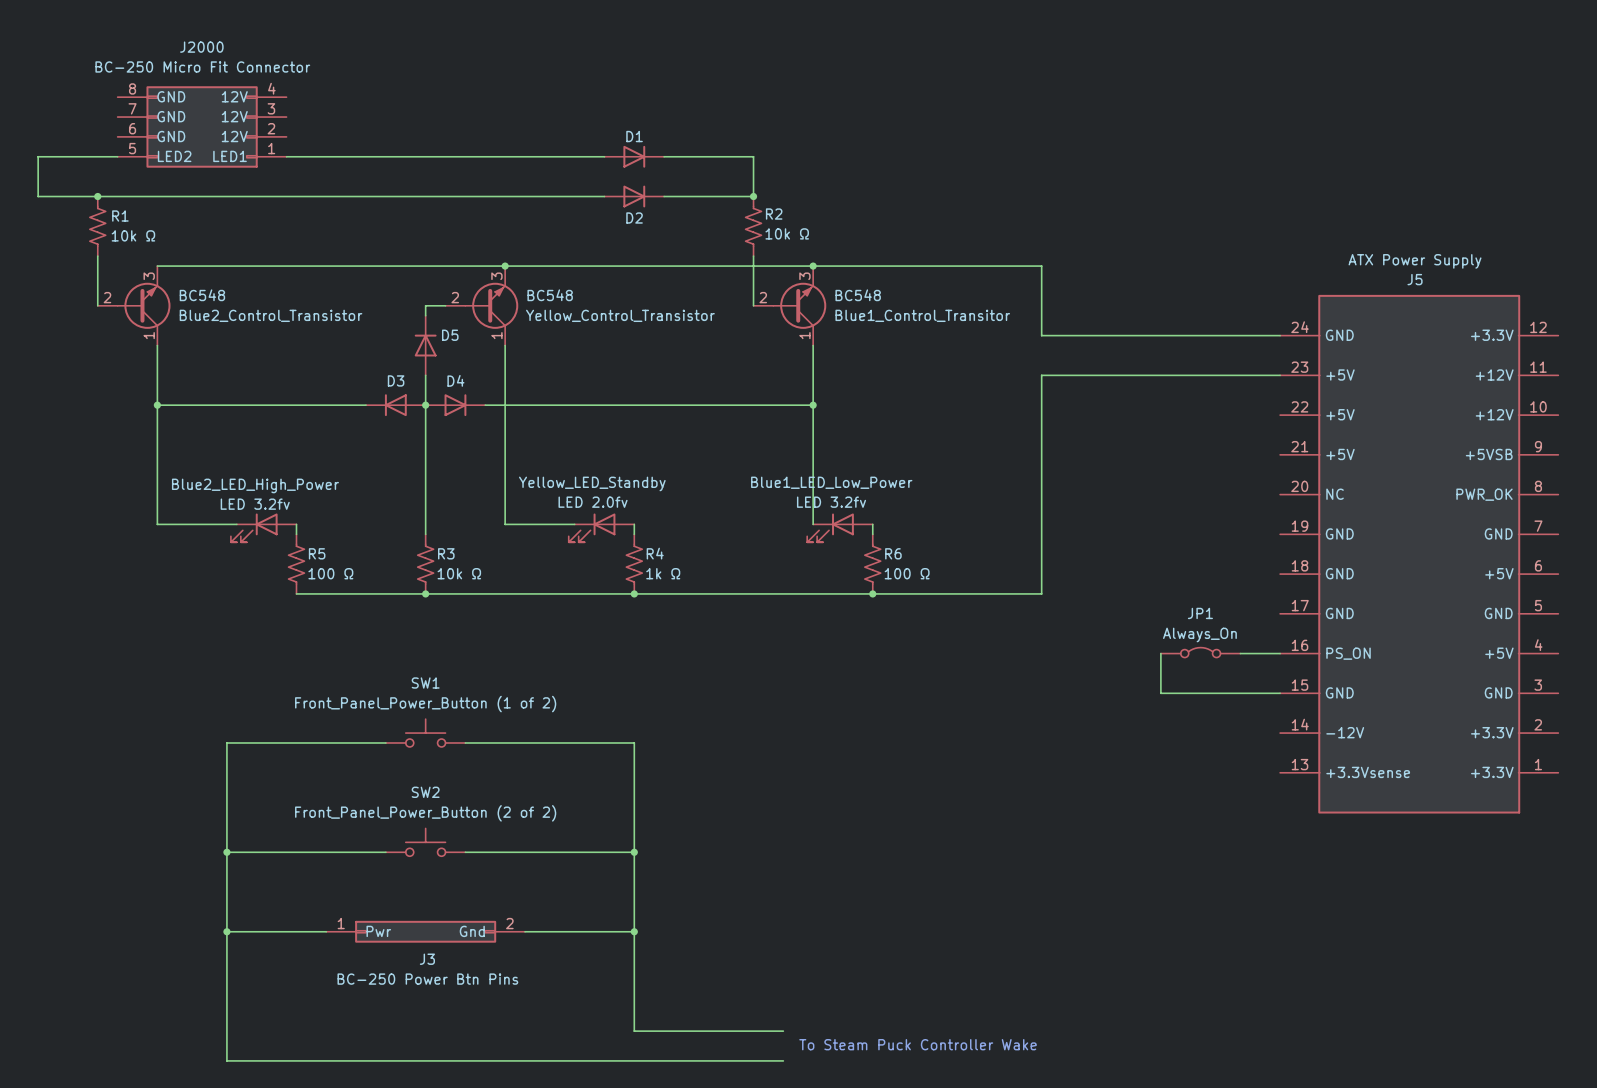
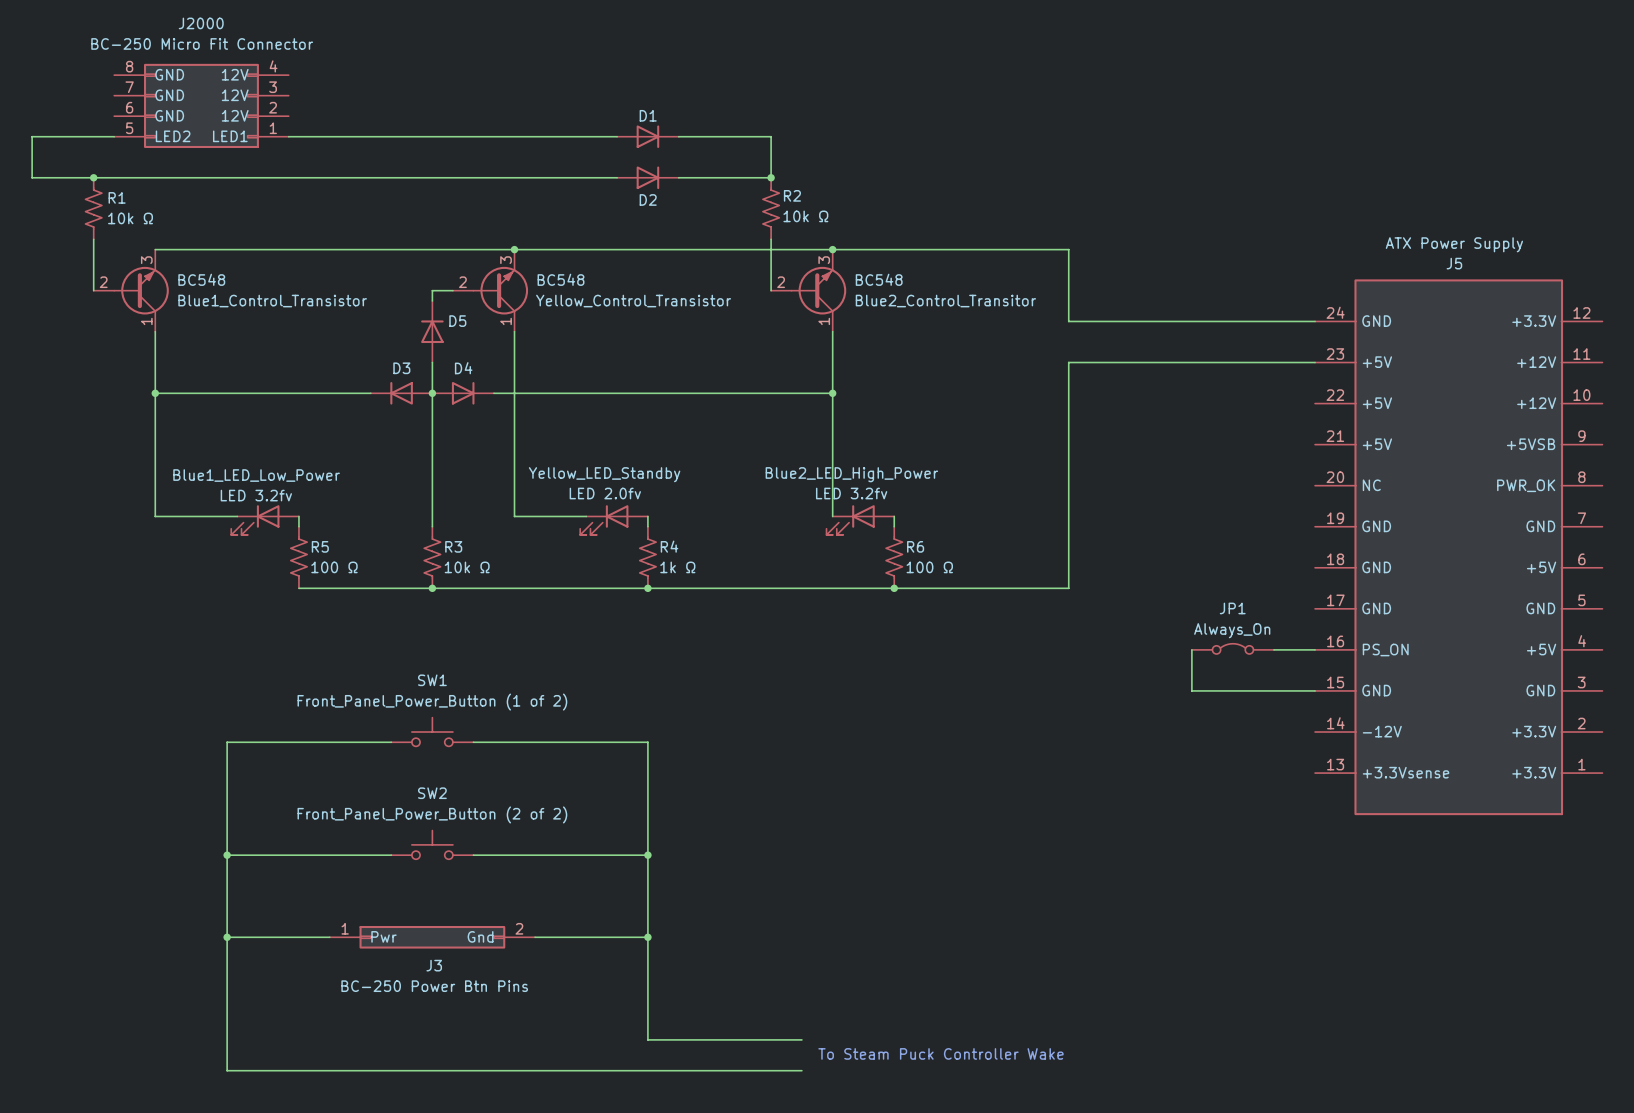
Blue2_Control_Transistor name: Blue2_Control_Transistor (271, 315) -> Blue1_Control_Transistor (272, 301)
Blue1_Control_Transitor name: Blue1_Control_Transitor (922, 315) -> Blue2_Control_Transitor (945, 301)
Blue1_LED_Low_Power name: Blue1_LED_Low_Power (831, 482) -> Blue2_LED_High_Power (851, 474)
Blue2_LED_High_Power name: Blue2_LED_High_Power (255, 485) -> Blue1_LED_Low_Power (256, 475)

